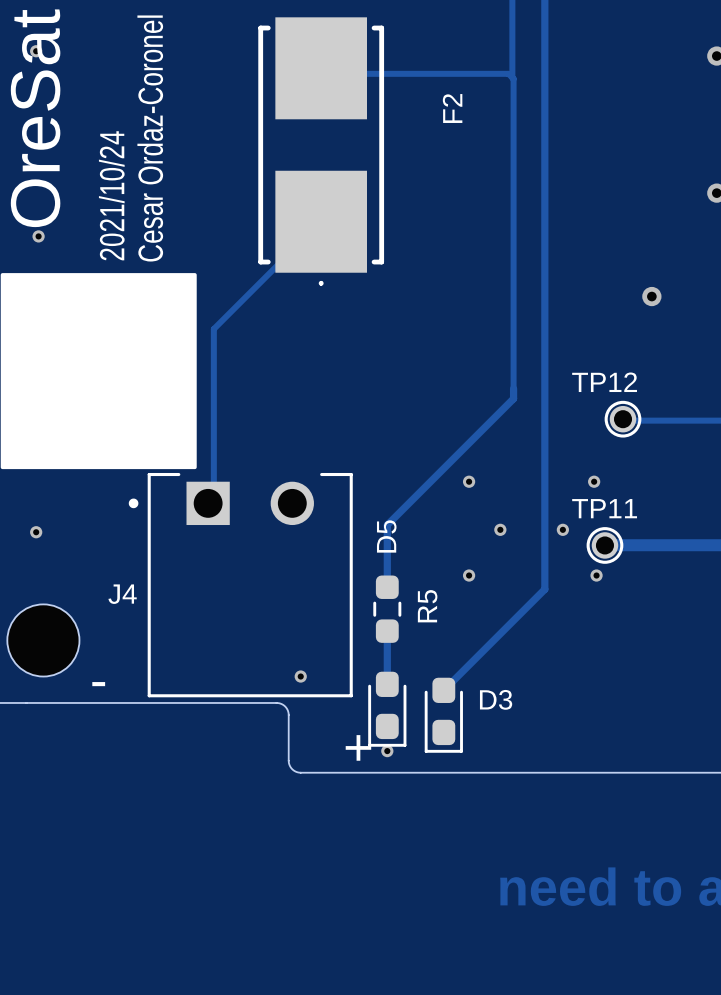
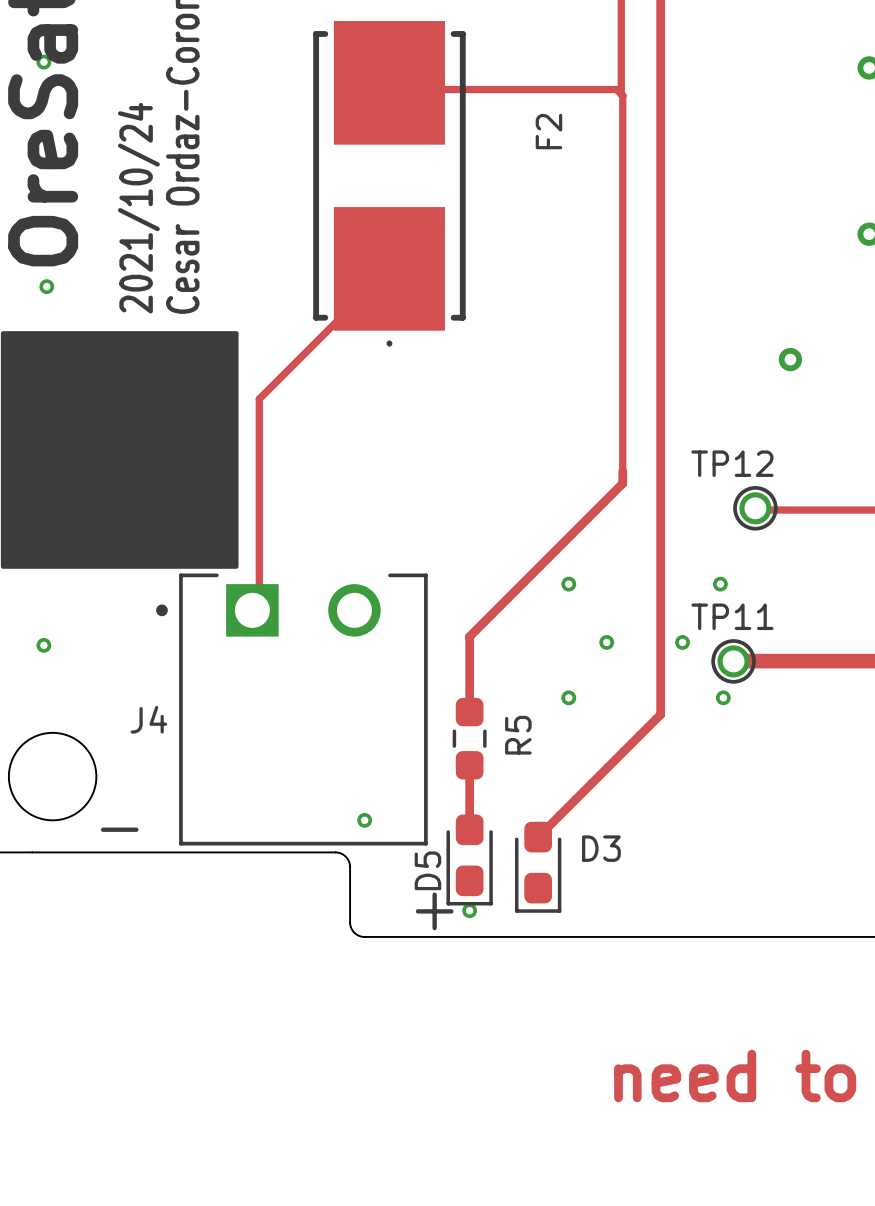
D5 name position: D5 (386, 536) -> D5 (427, 870)

